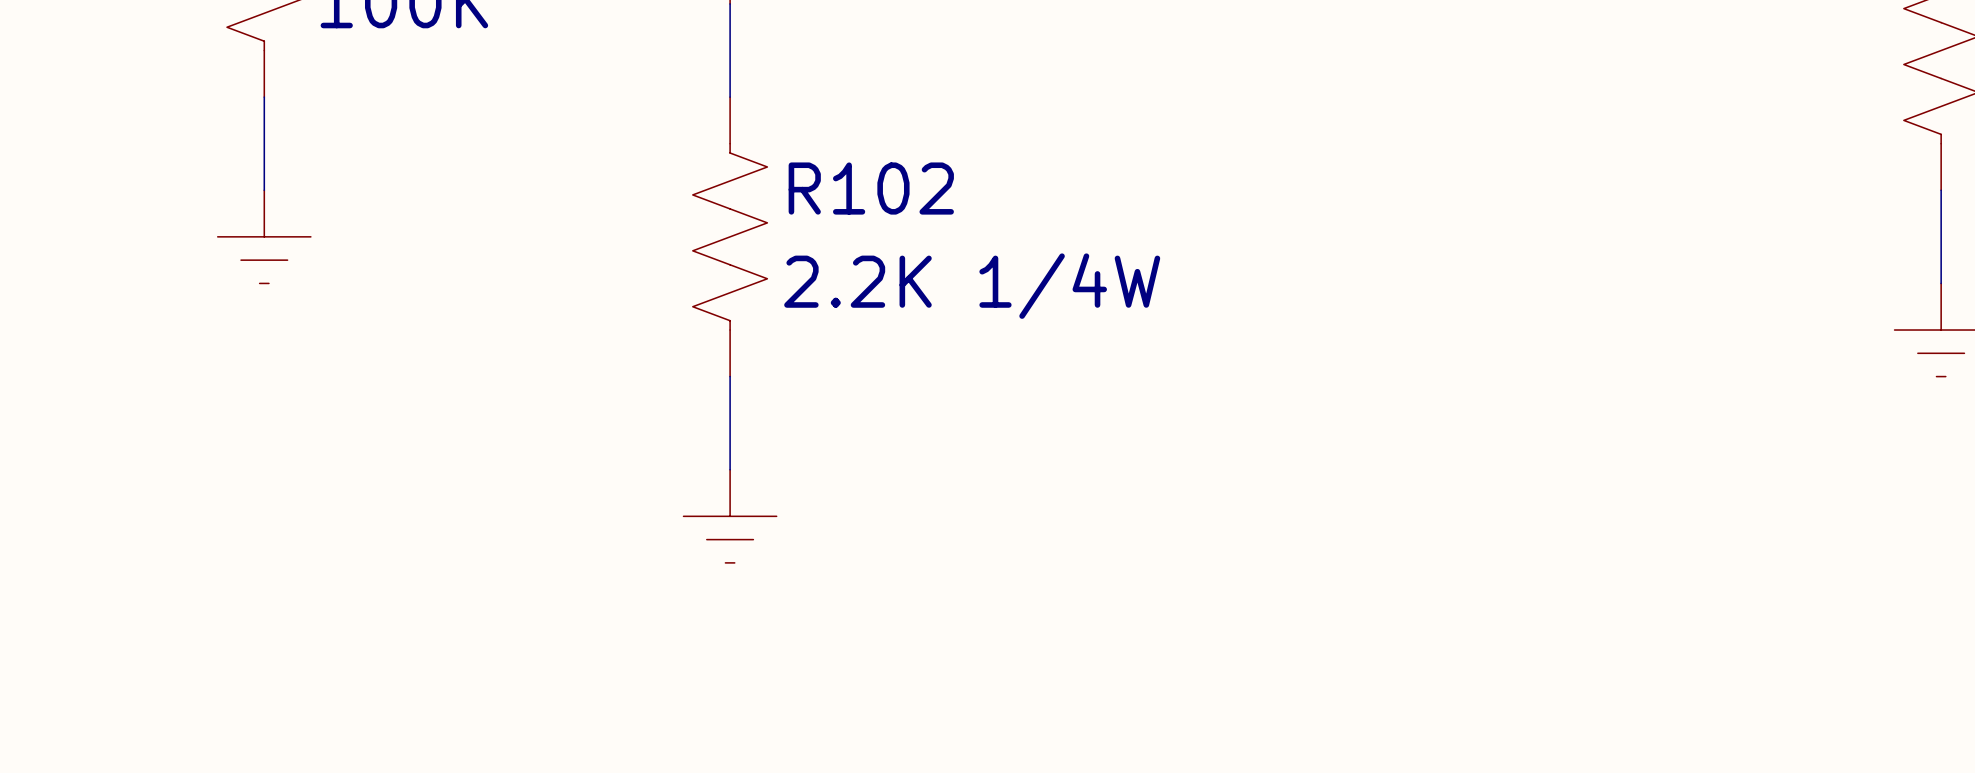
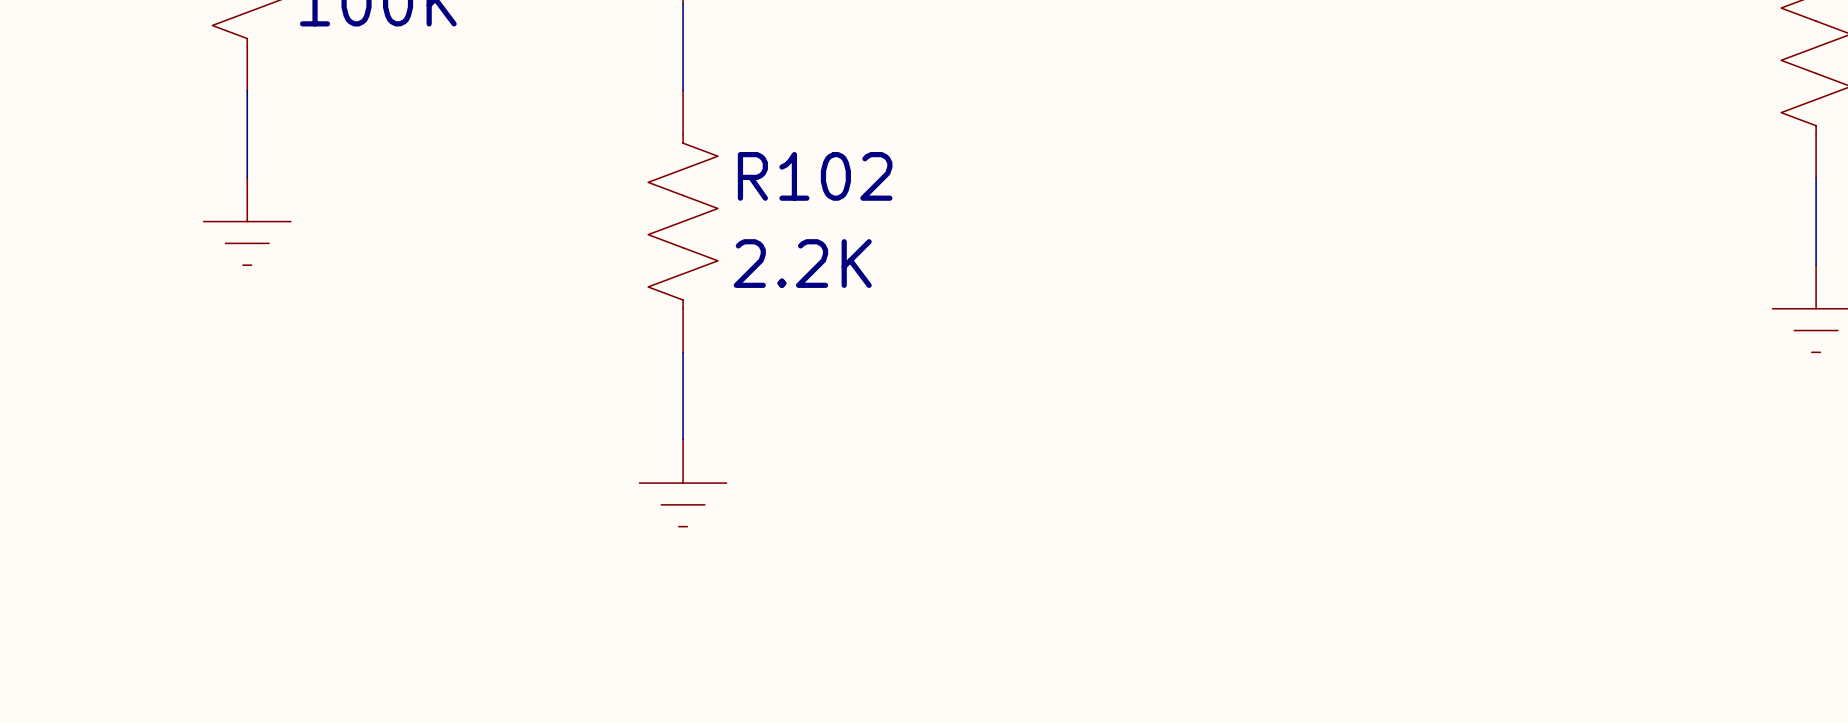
R102 value: 2.2K 1/4W (972, 286) -> 2.2K (802, 263)

